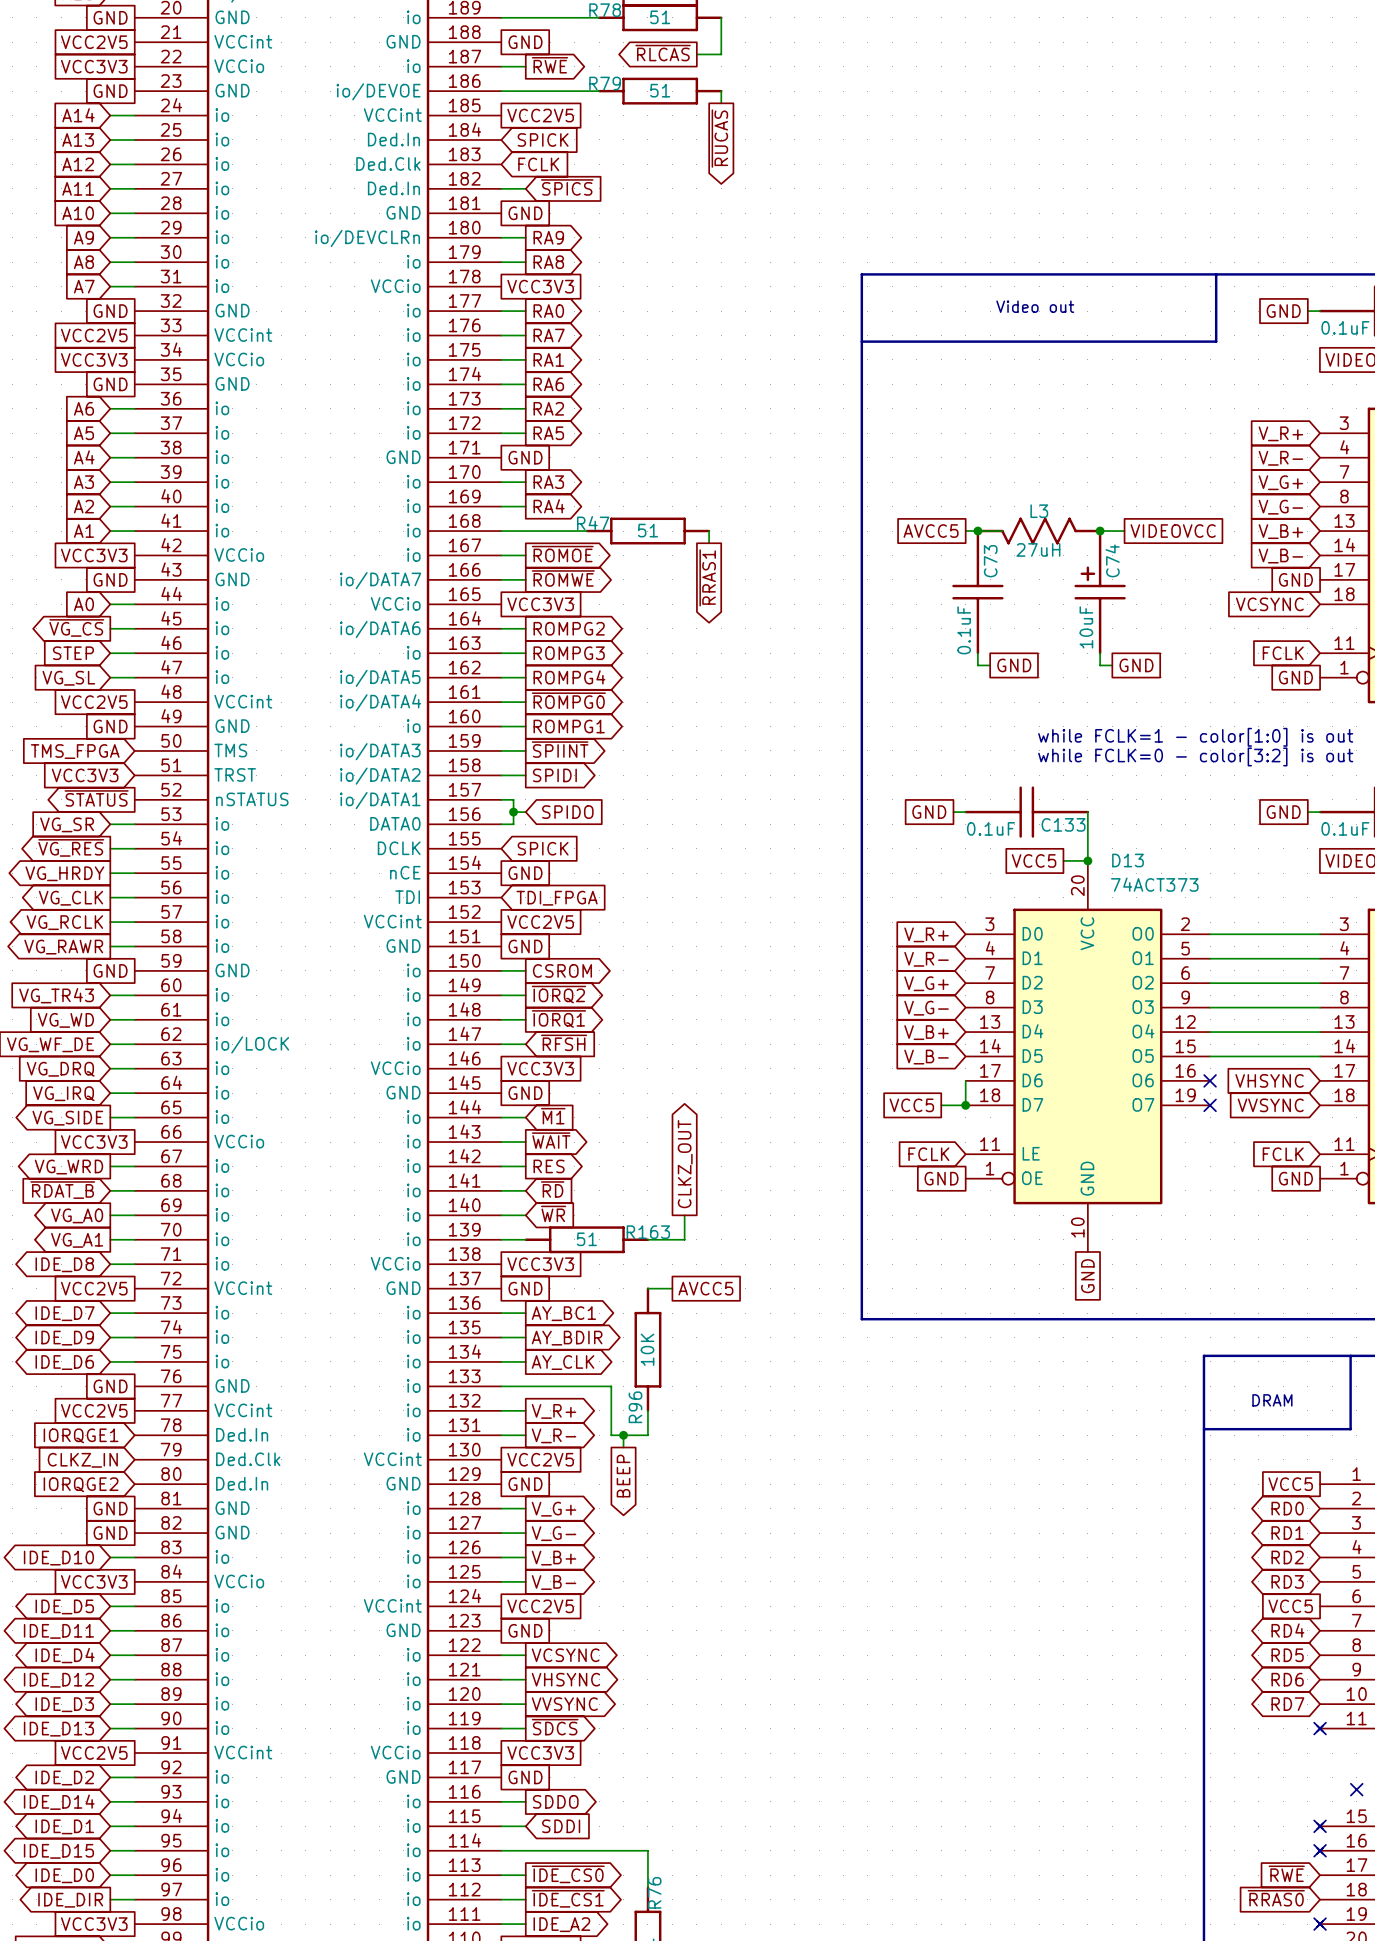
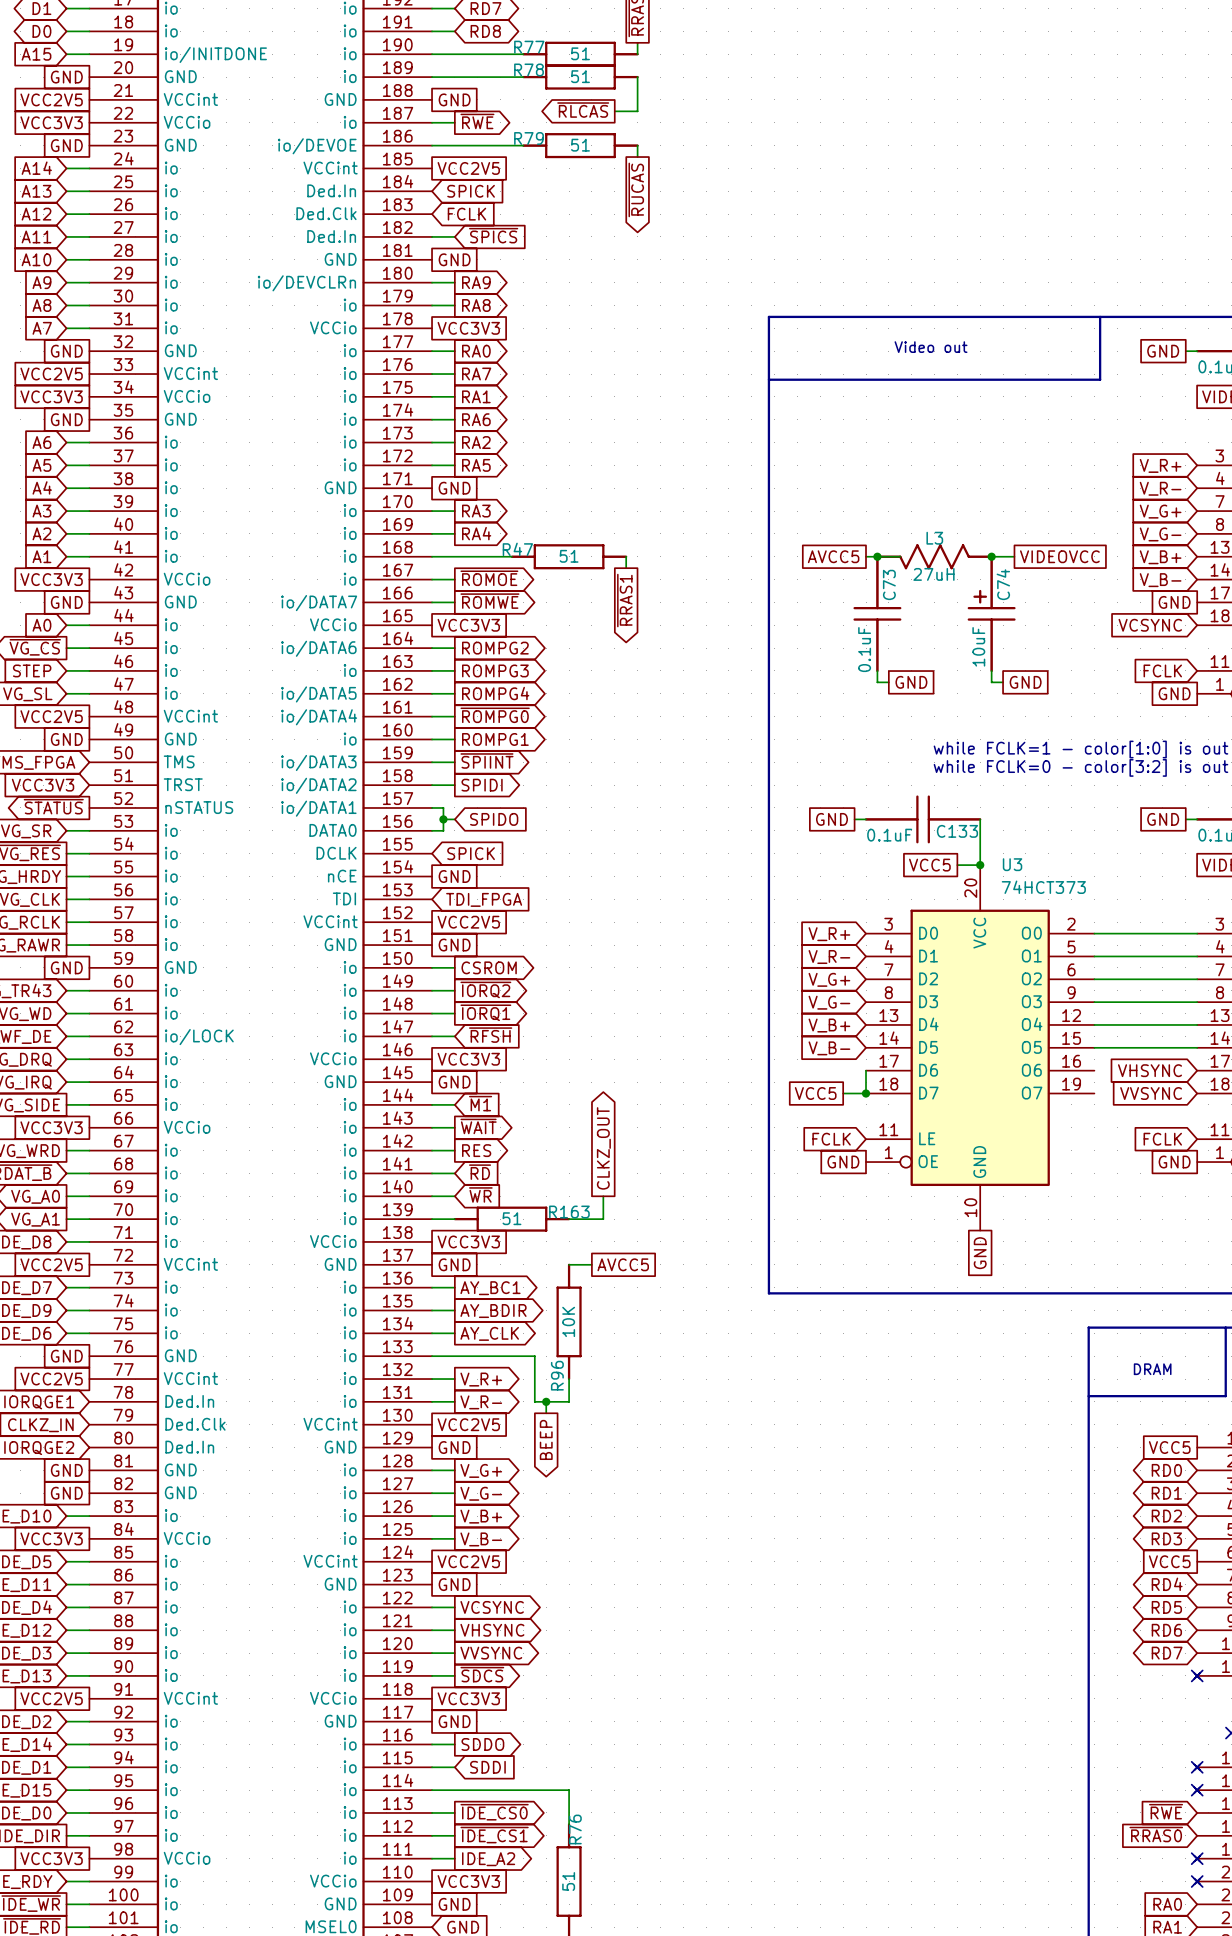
D13 name: D13 (1128, 860) -> U3 (1012, 864)
D13 value: 74ACT373 (1154, 884) -> 74HCT373 (1043, 887)
no-connect mark: (1210, 1080) -> none
no-connect mark: (1210, 1105) -> none

